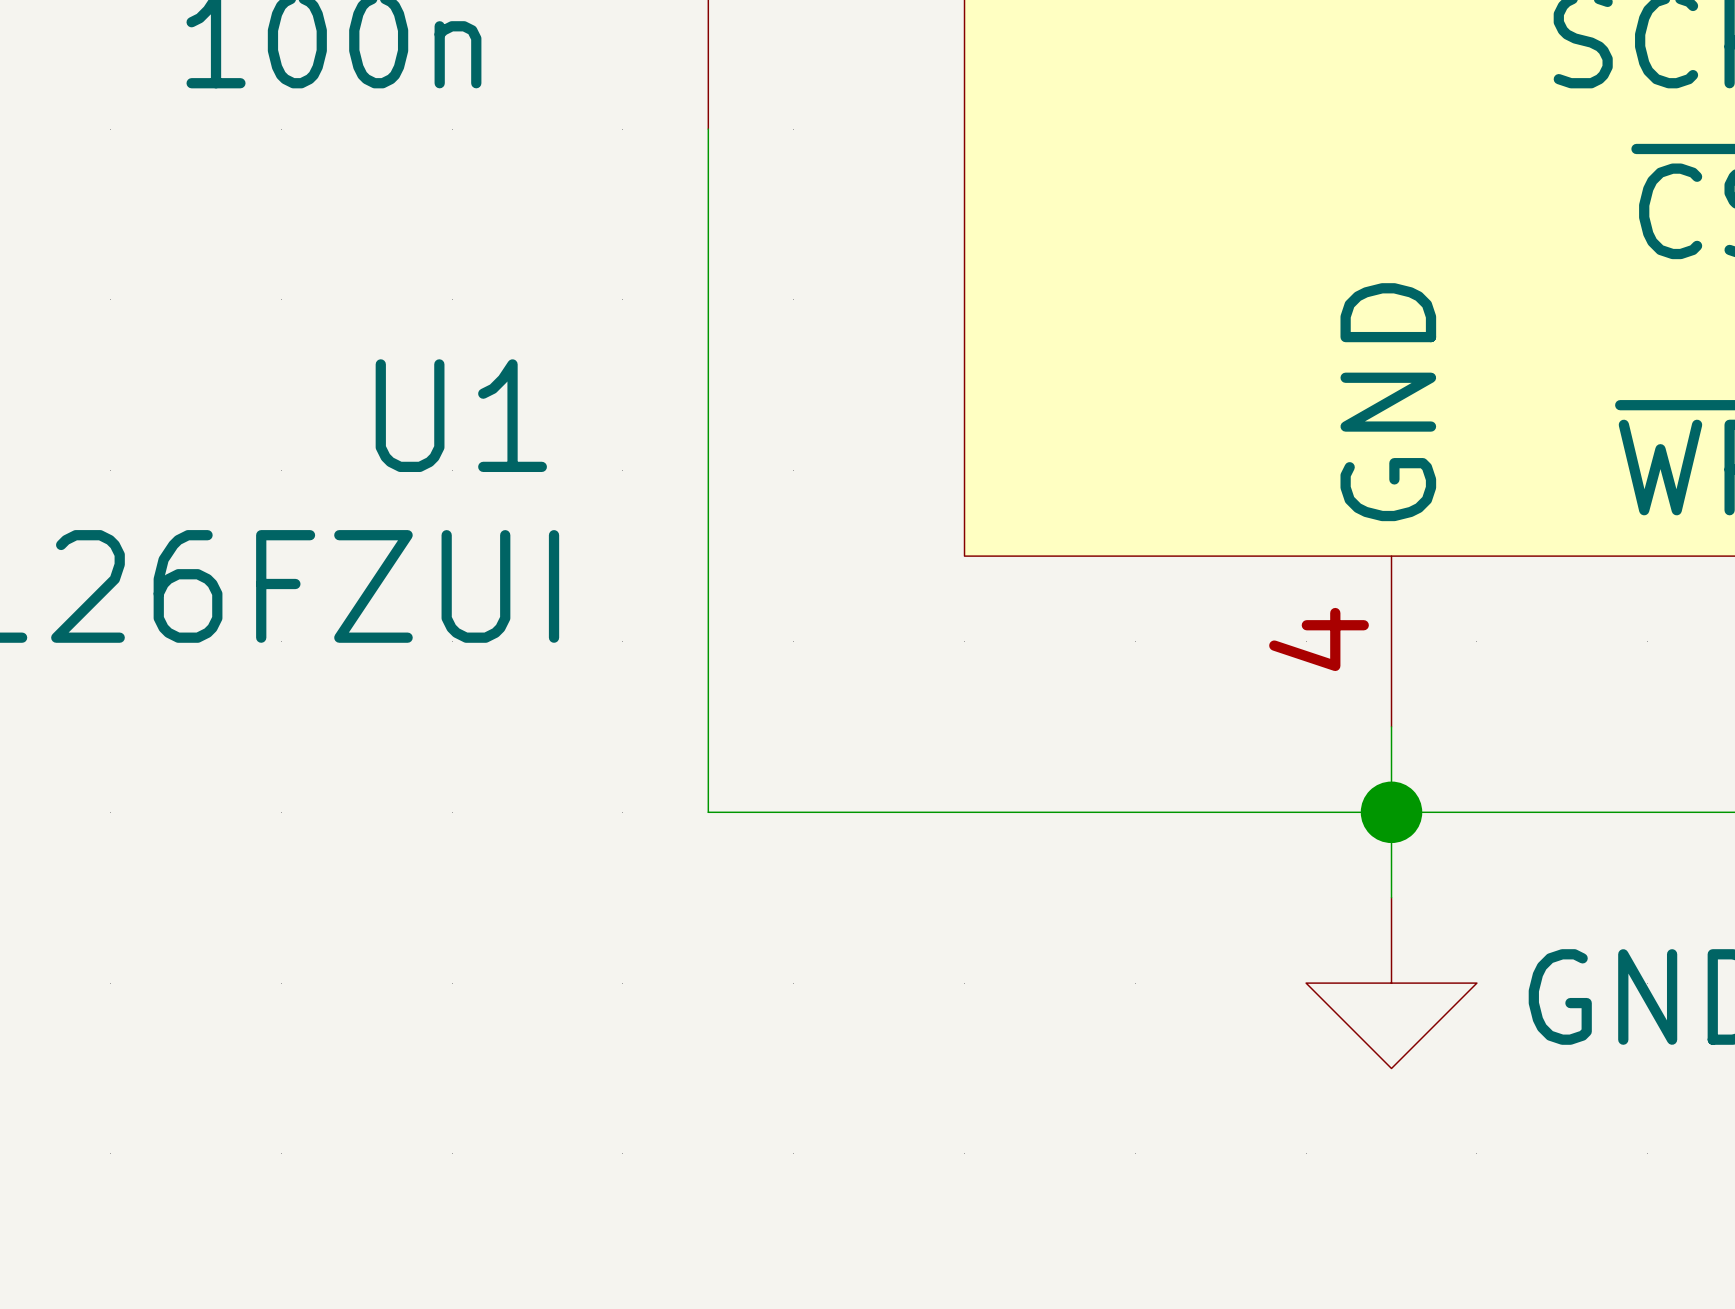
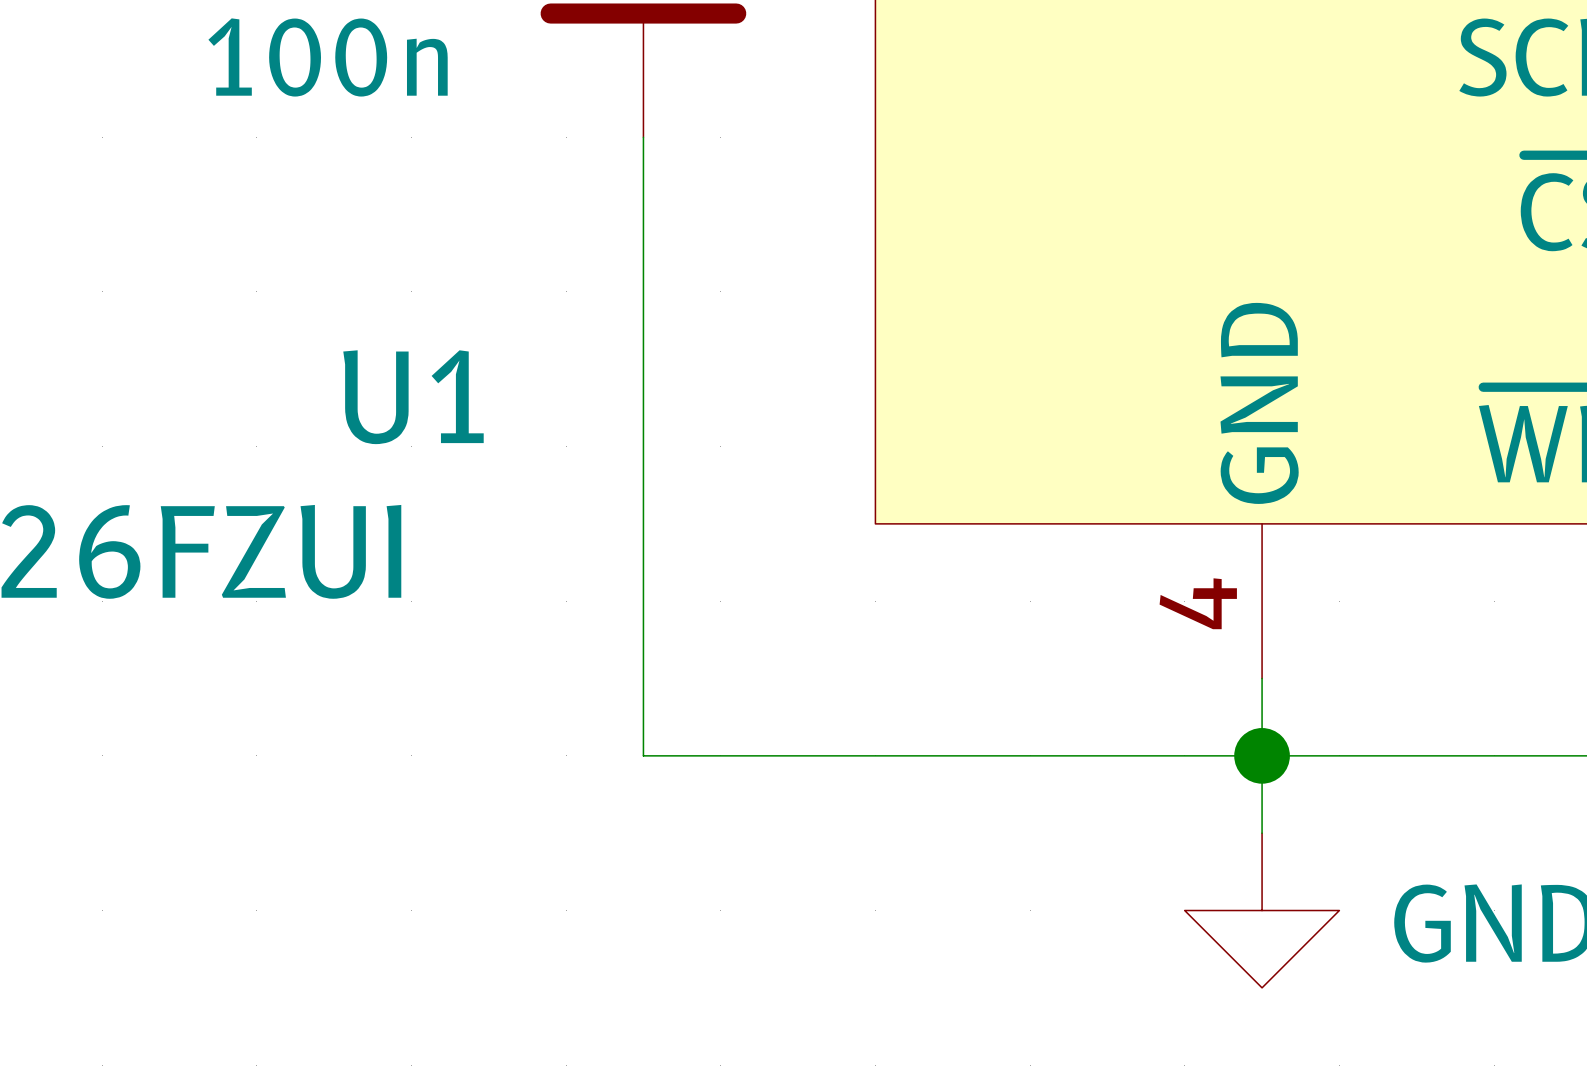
U1 name position: U1 (461, 415) -> U1 (413, 397)

